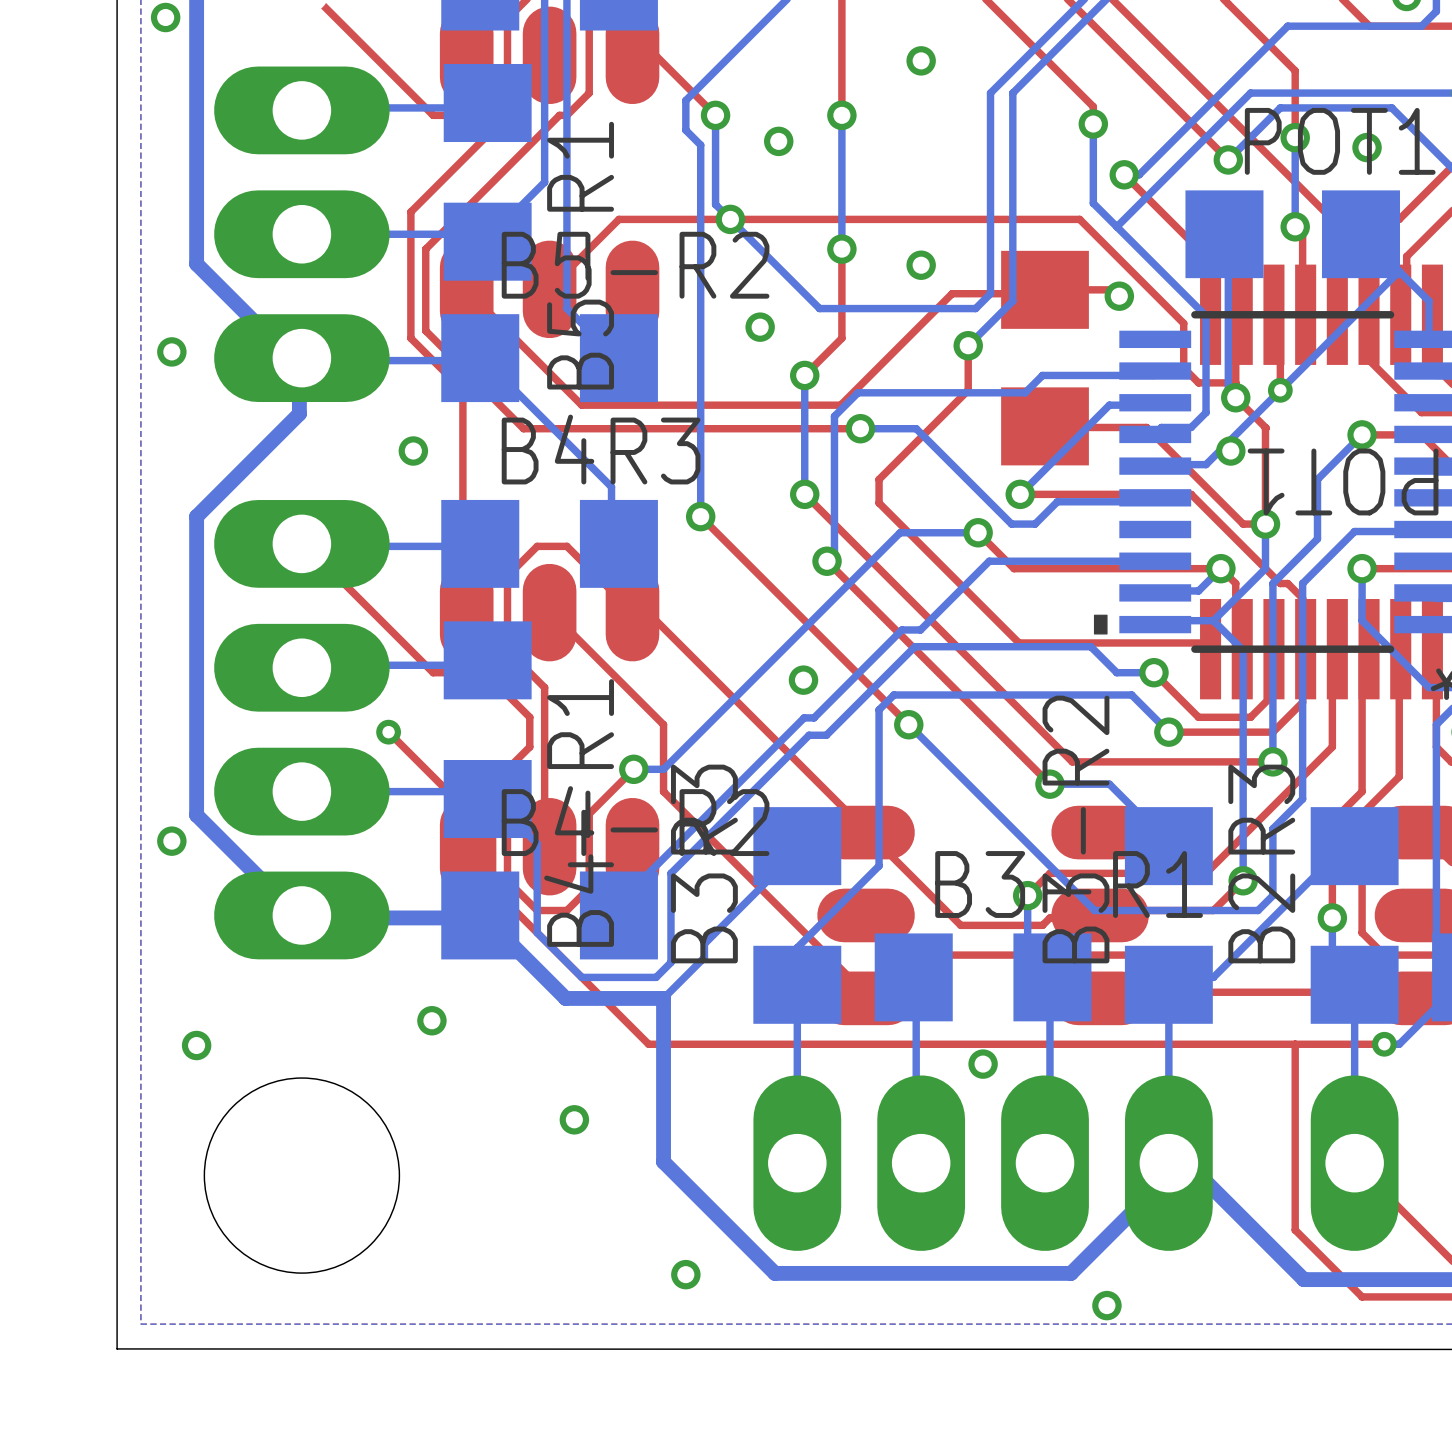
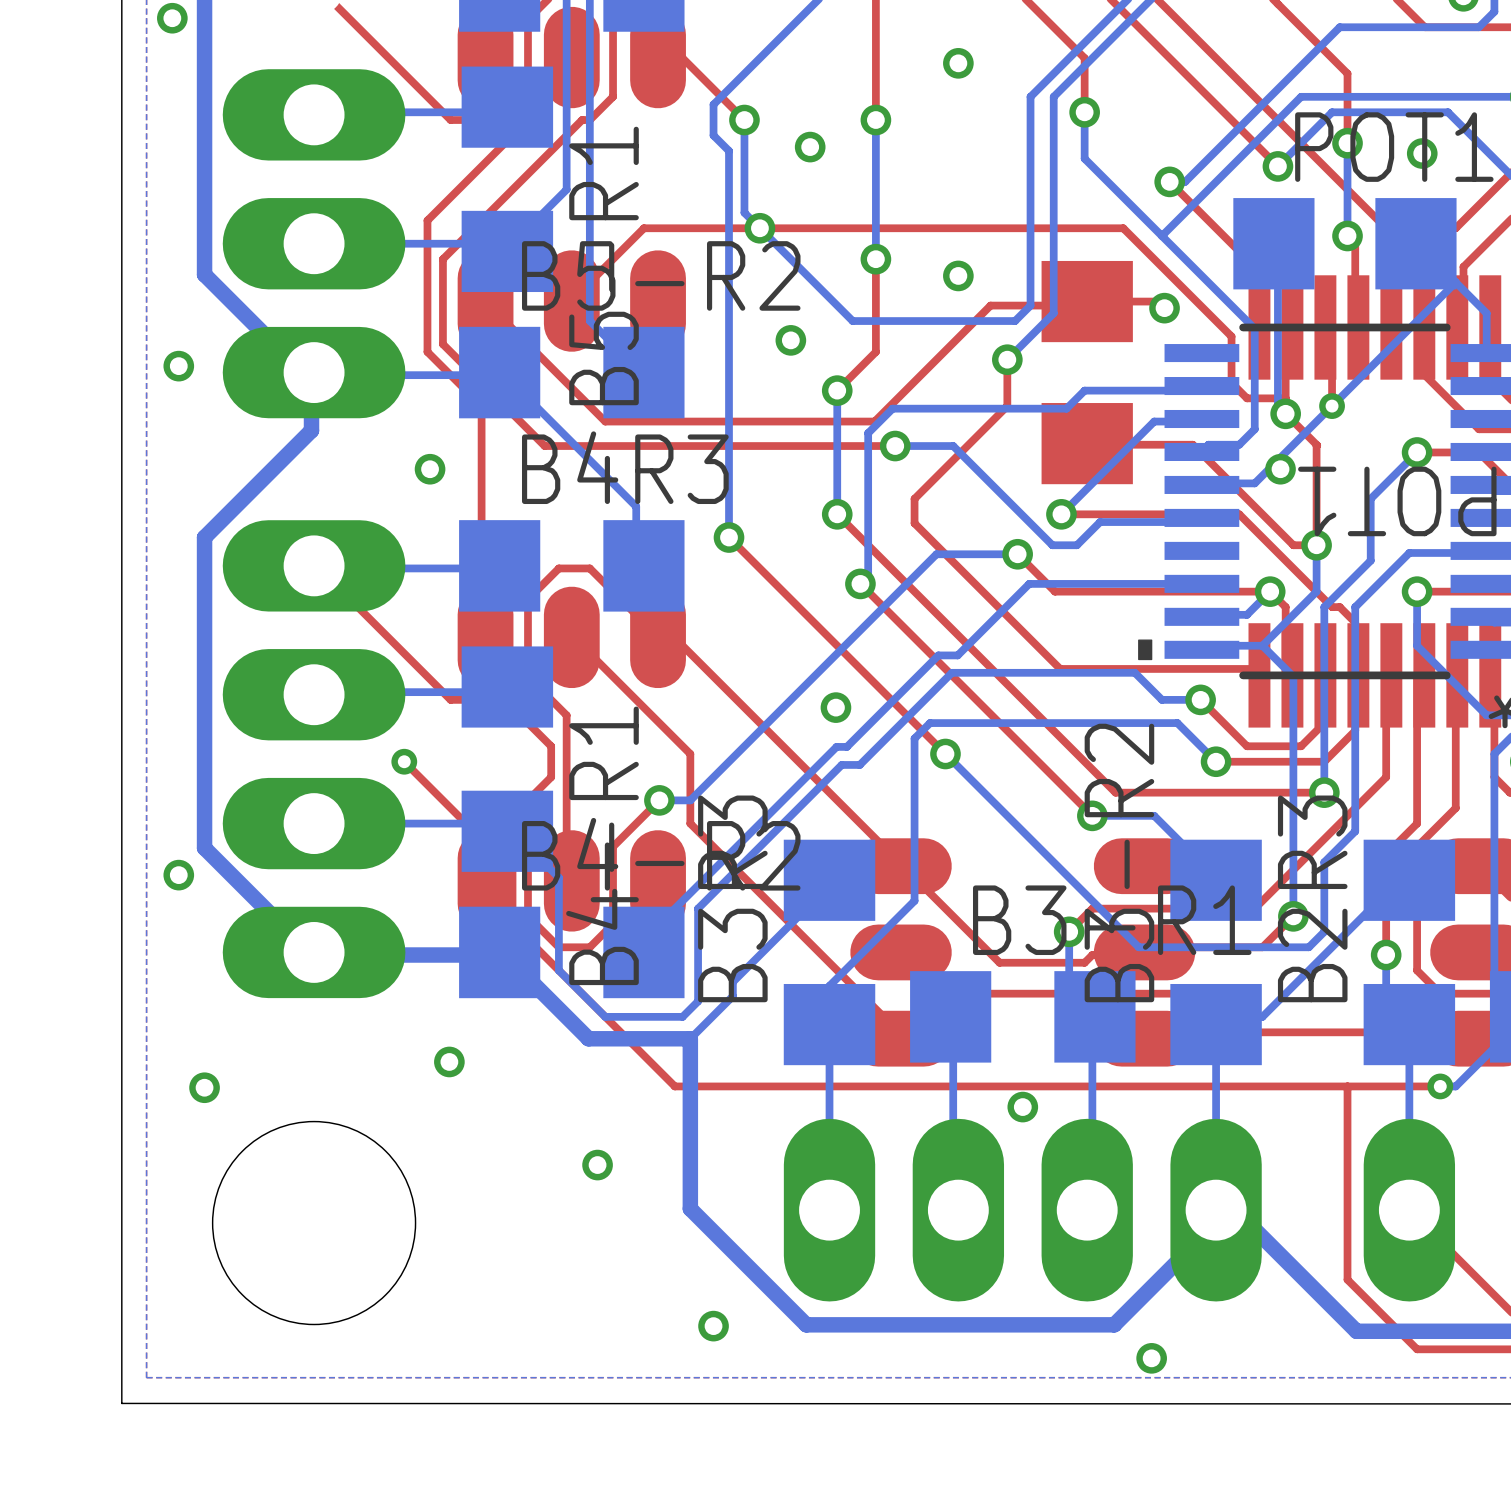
top track: (1042, 55) (1093, 106) (1093, 124) -> (1084, 58) (1084, 112)
bottom track: (1093, 124) (1093, 203) -> (1084, 112) (1084, 158) (1137, 211)
via position: (1093, 124) -> (1084, 112)

